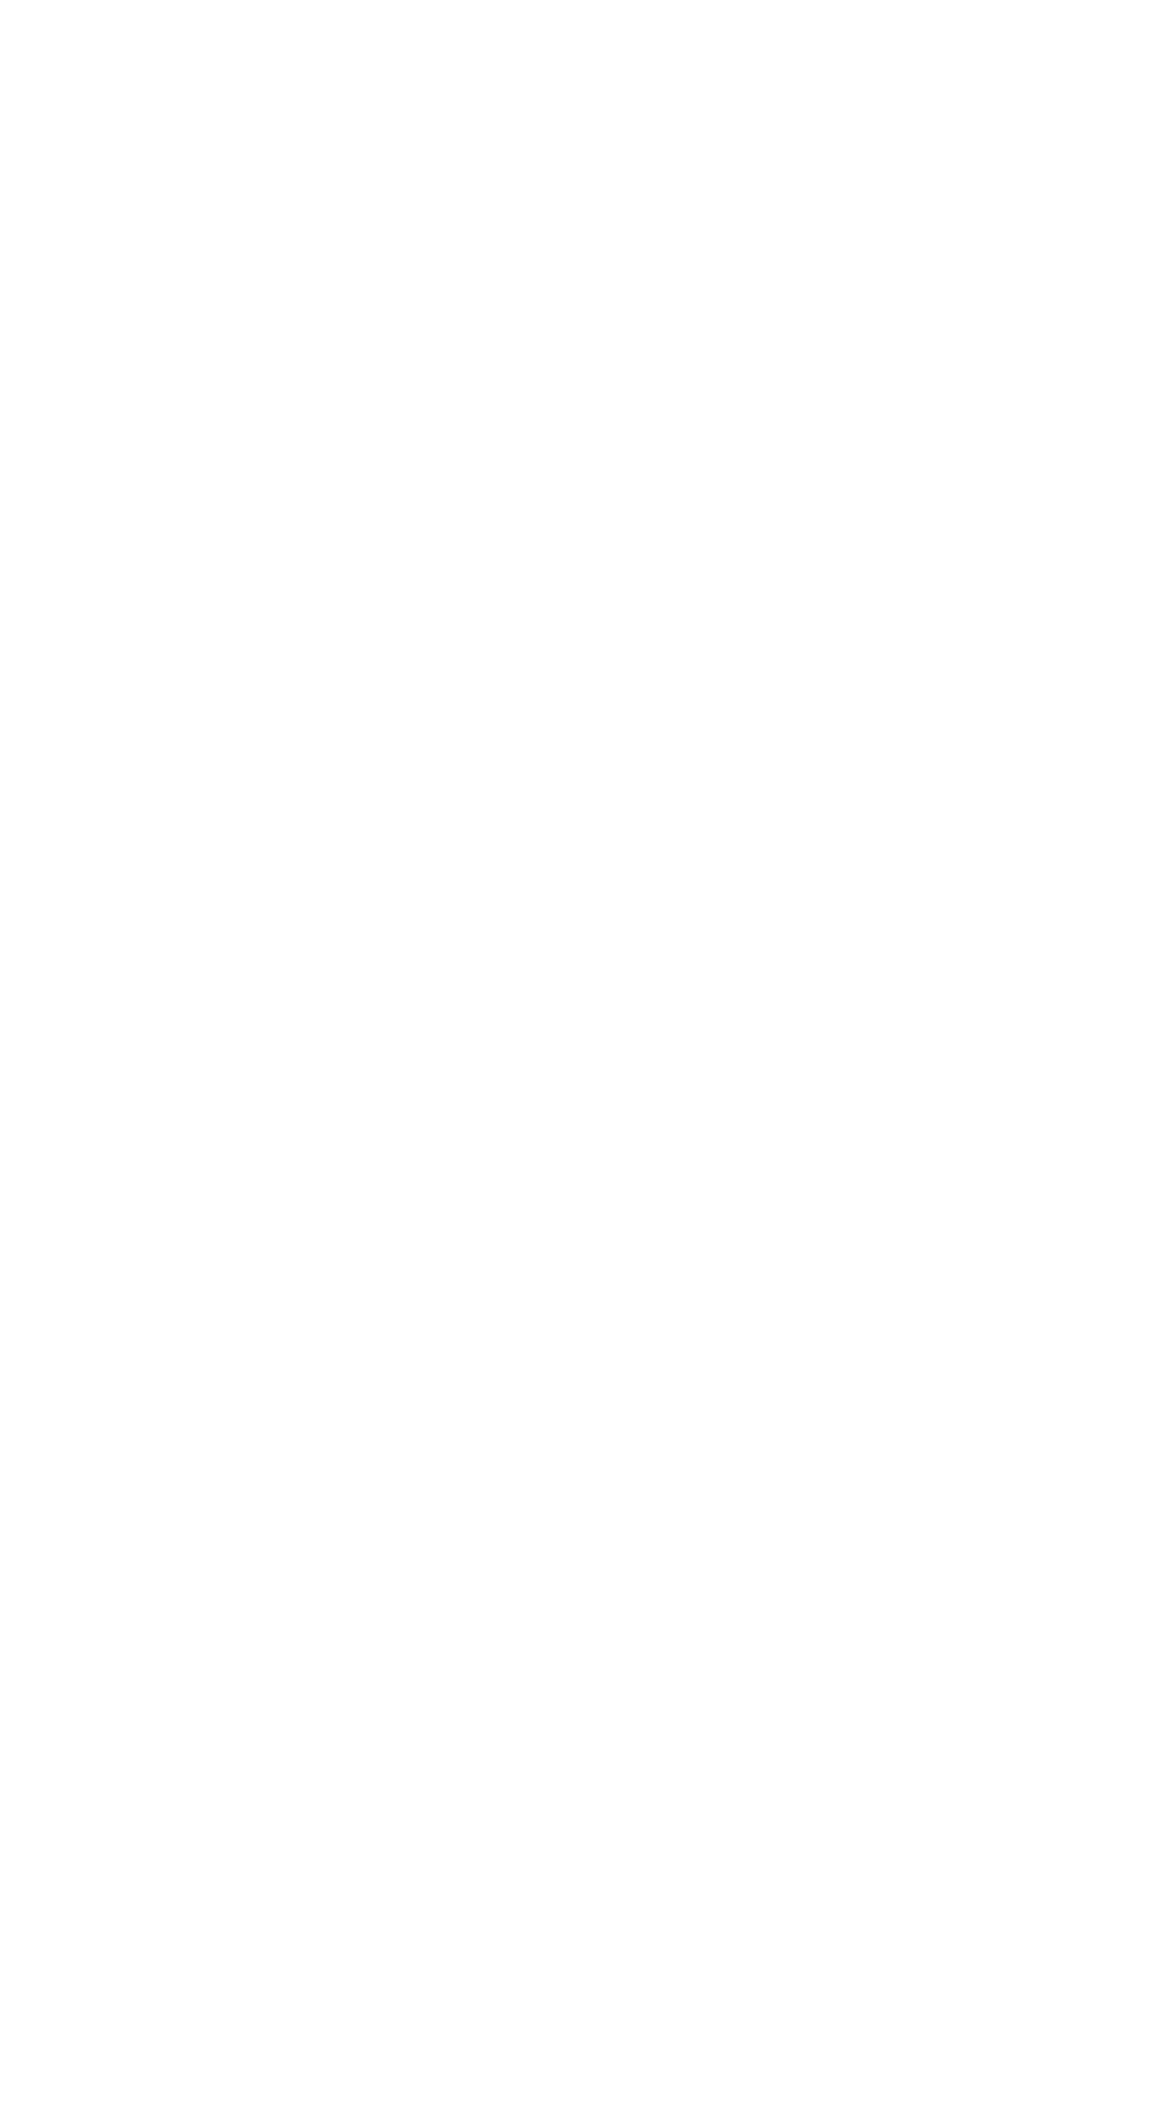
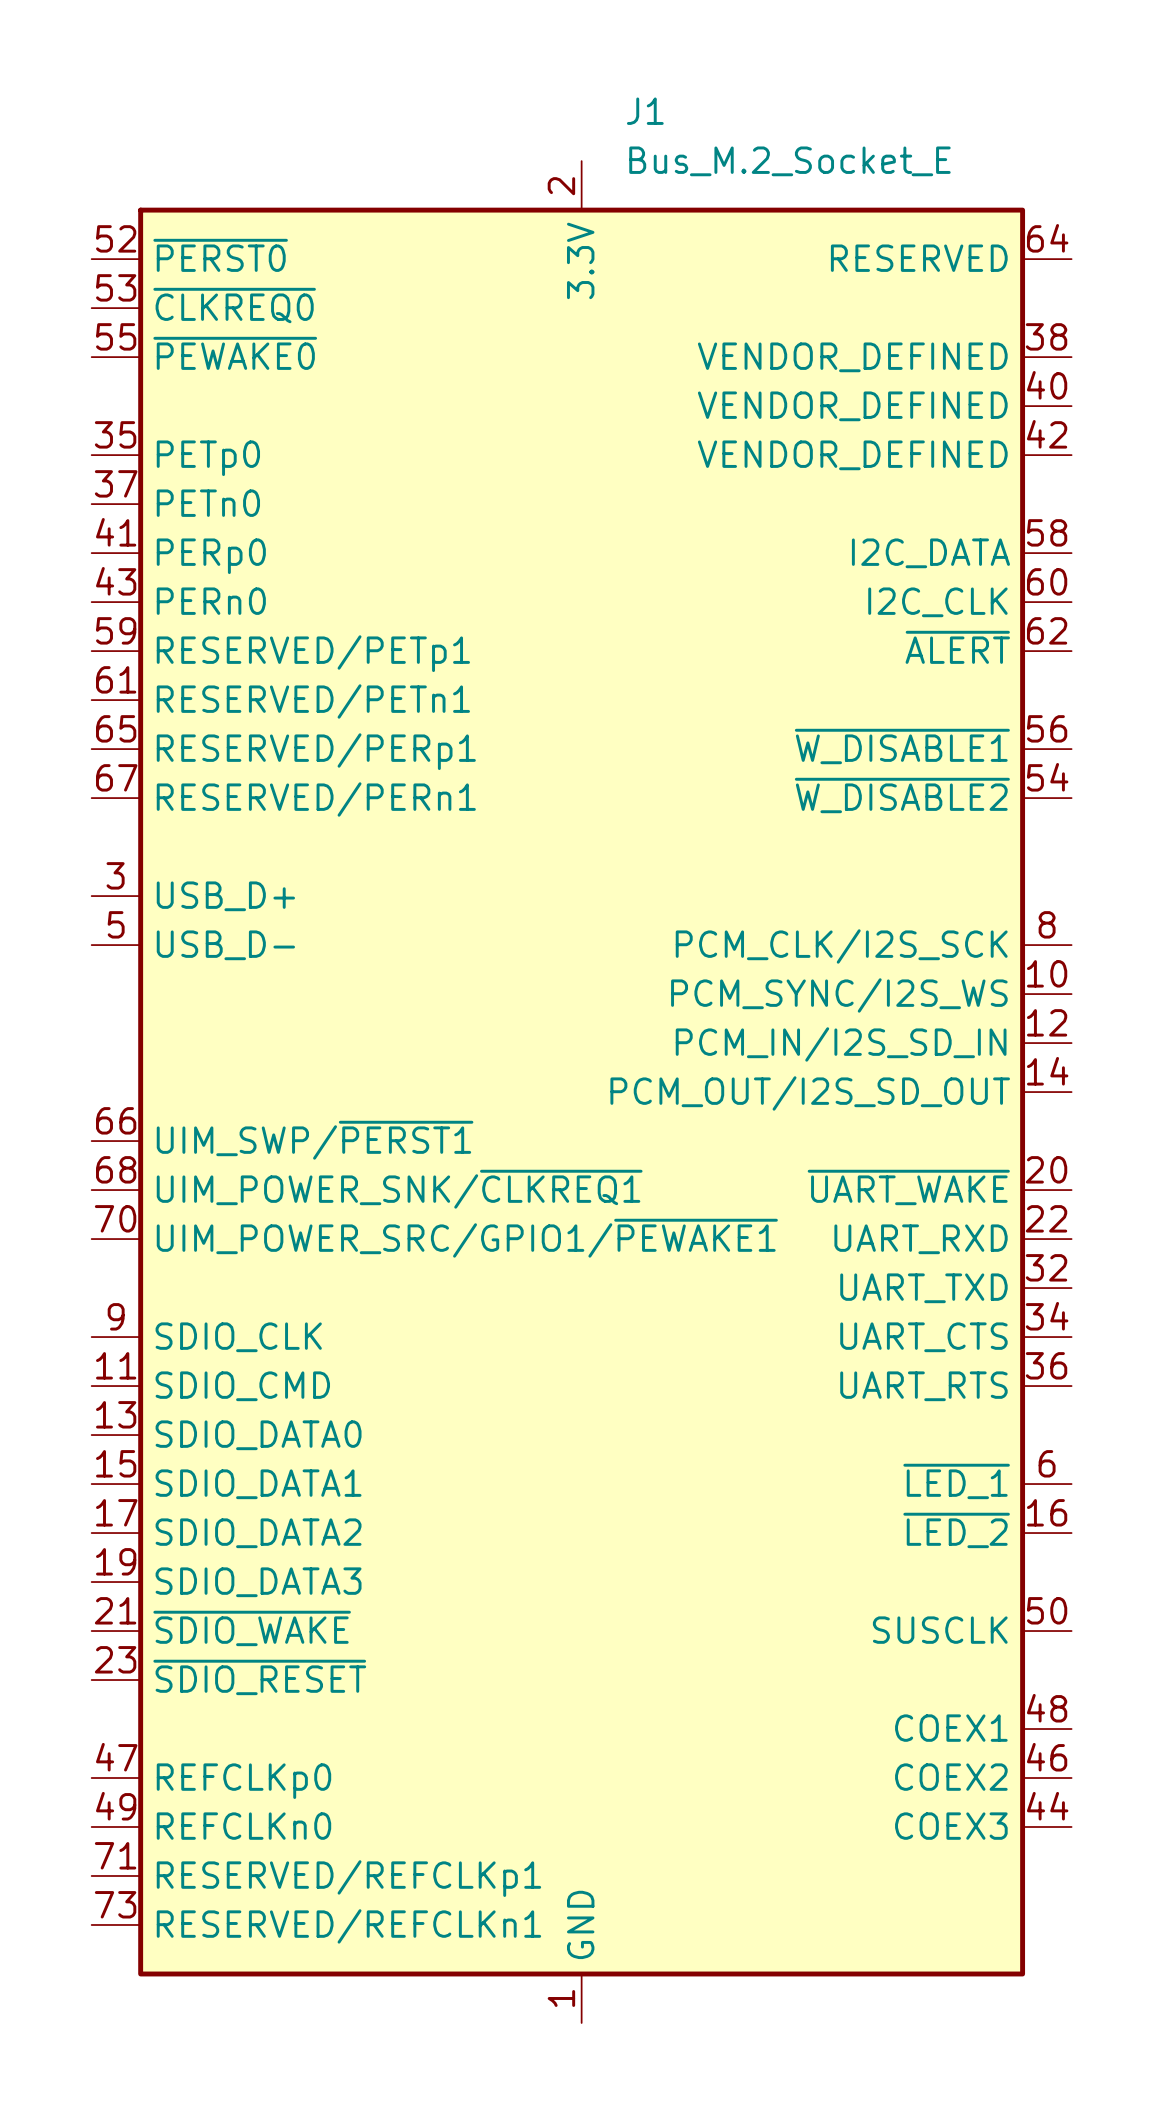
J1: none -> Bus_M.2_Socket_E (581, 1092)

